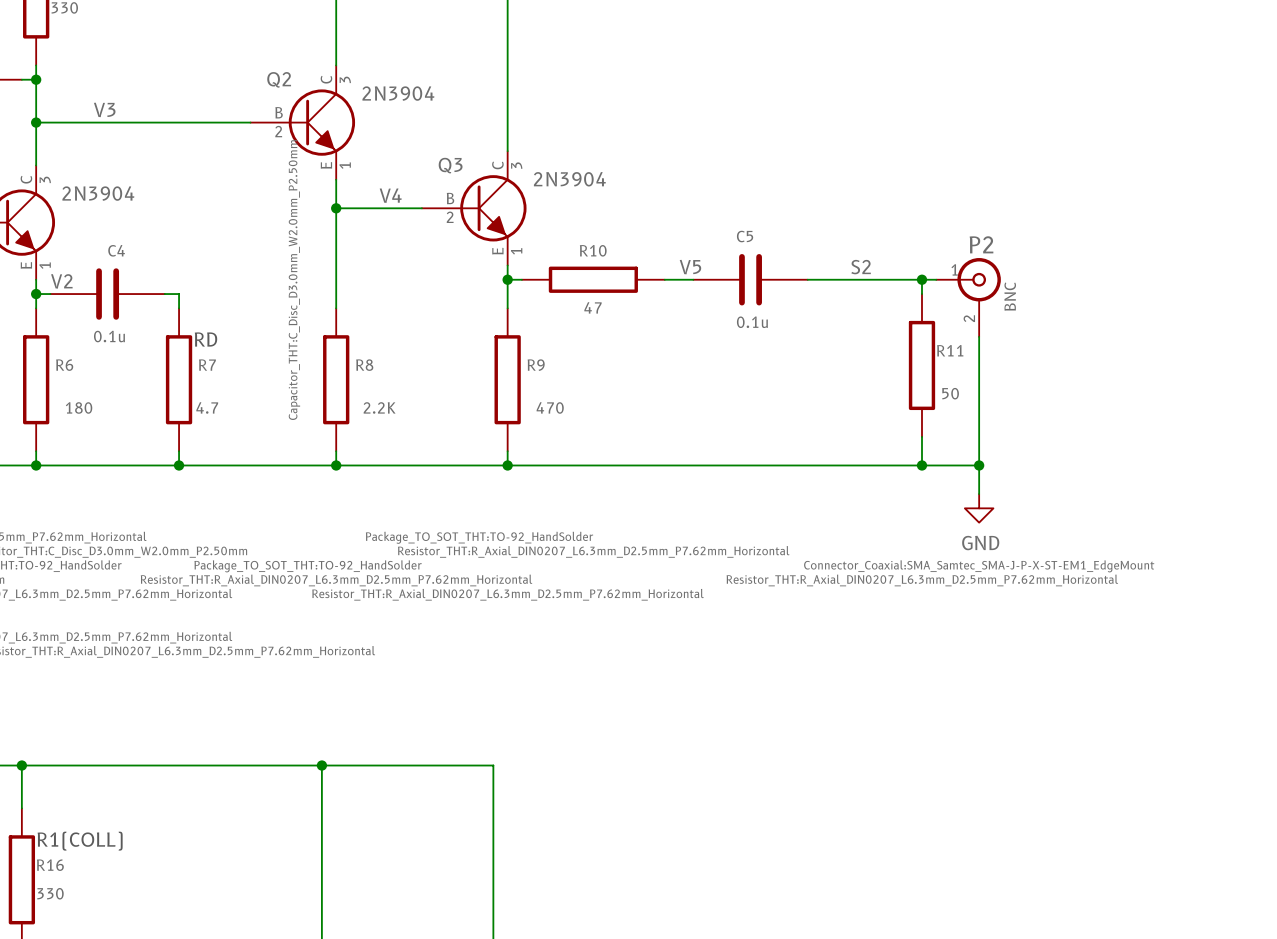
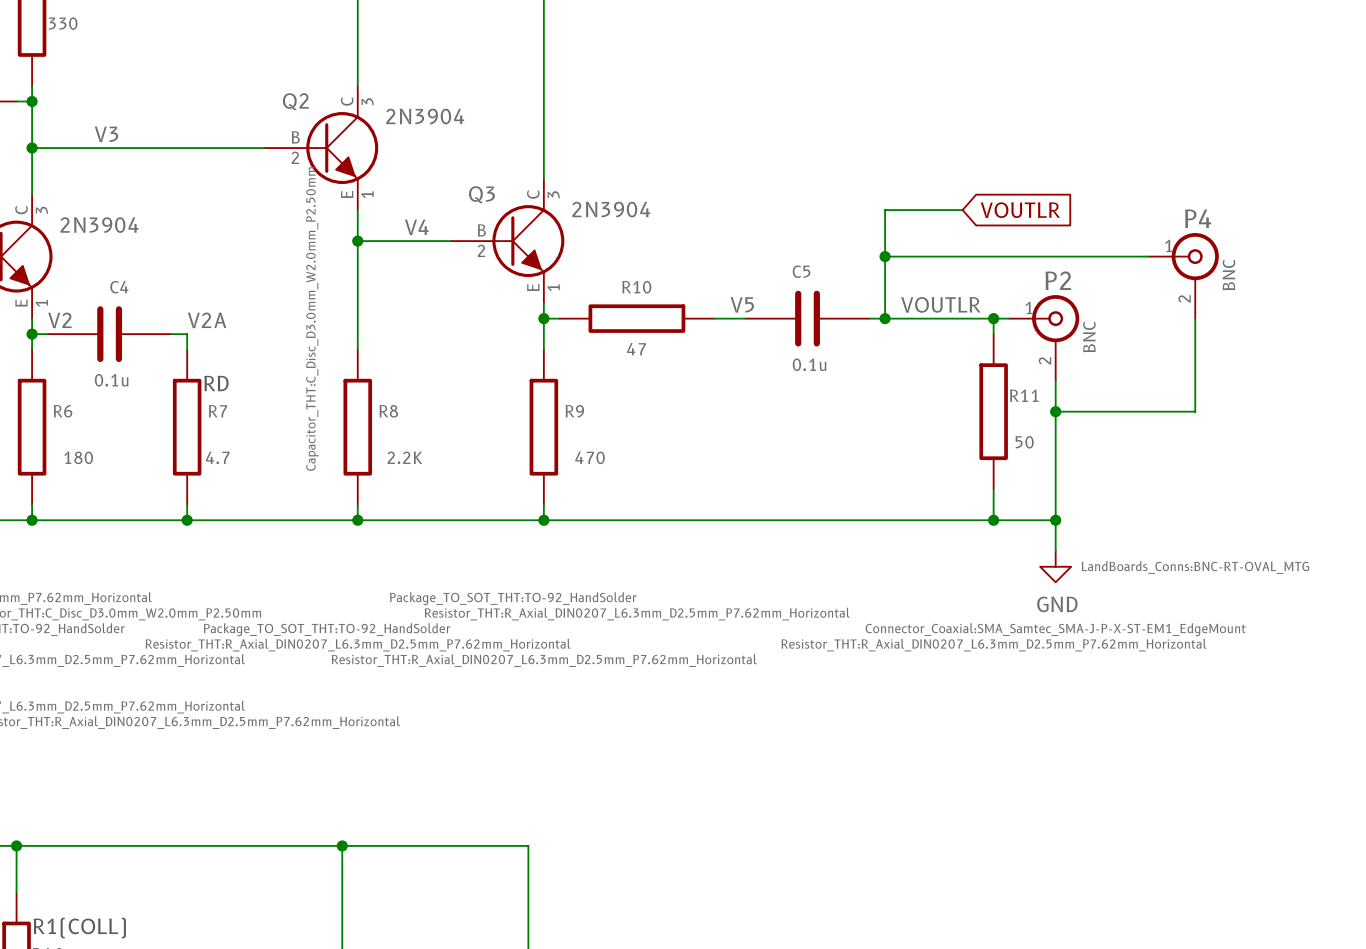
wire: none -> (962, 210) (885, 210) (885, 318)
global label: none -> VOUTLR (1020, 210)
wire: none -> (885, 256) (1148, 256)
junction: none -> (885, 256)
P4: none -> BNC (1183, 275)
label: S2 (861, 267) -> none
label: none -> VOUTLR (940, 304)
junction: none -> (885, 318)
wire: none -> (1195, 318) (1195, 411) (1055, 411)
label: none -> V2A (207, 320)
junction: none -> (1055, 411)

